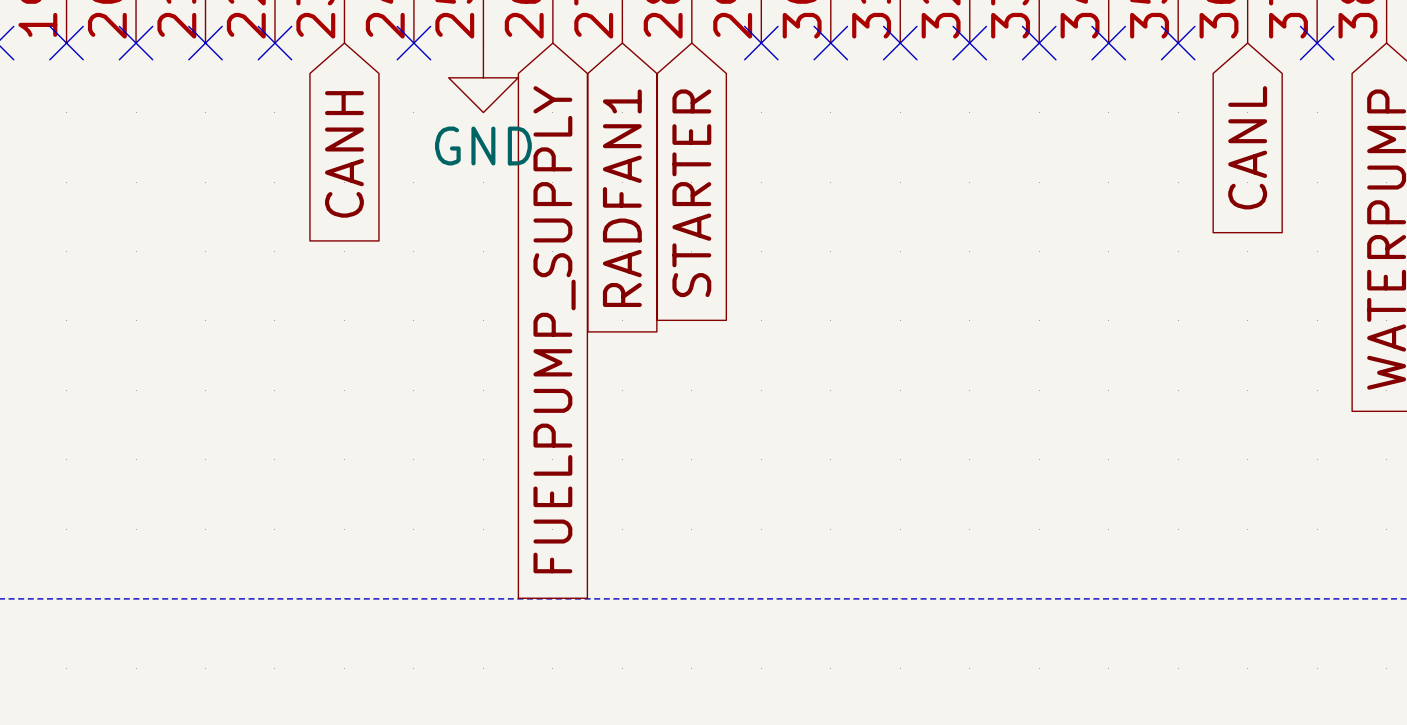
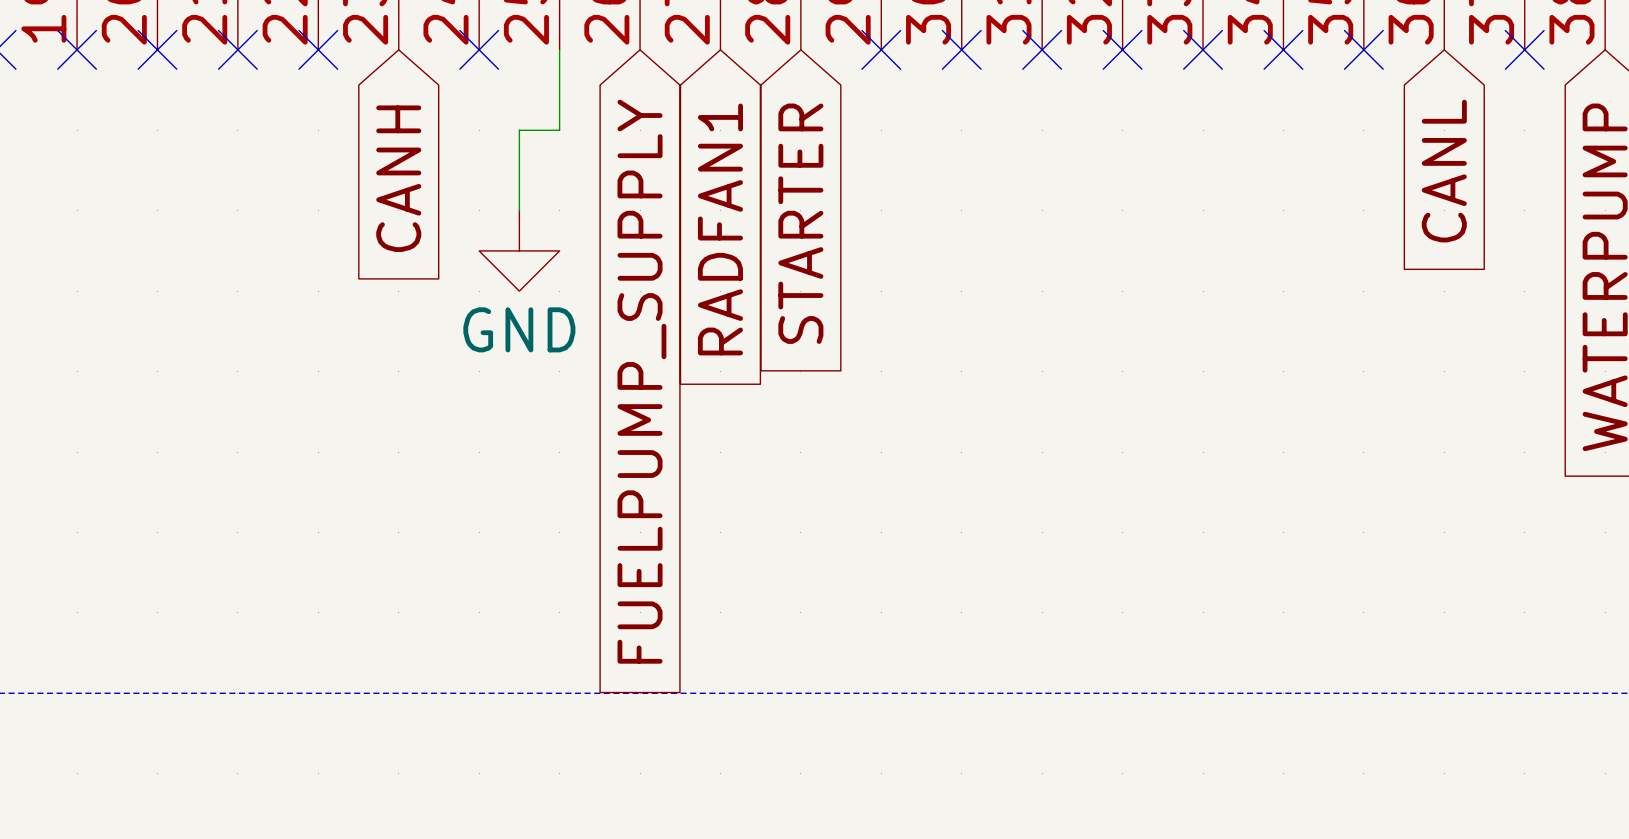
wire: none -> (559, 49) (559, 130) (519, 130) (519, 210)
power symbol position: GND (483, 77) -> GND (519, 250)

